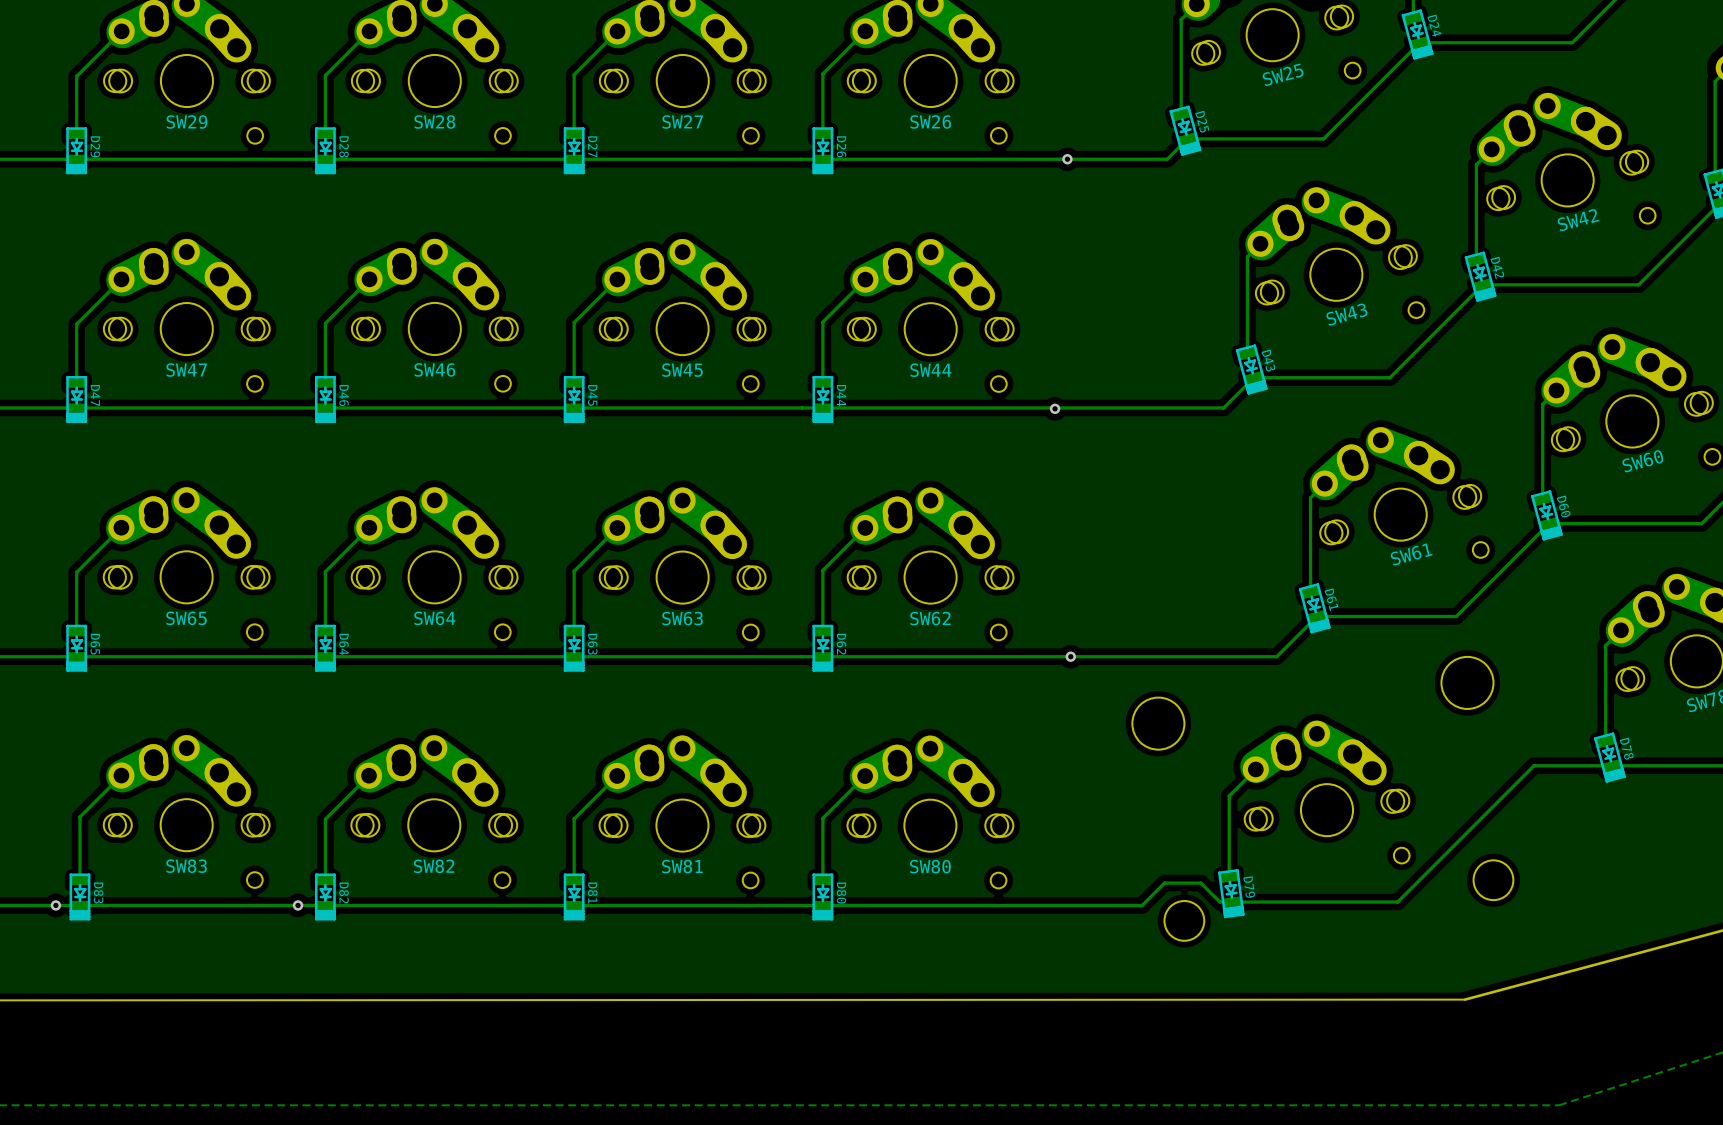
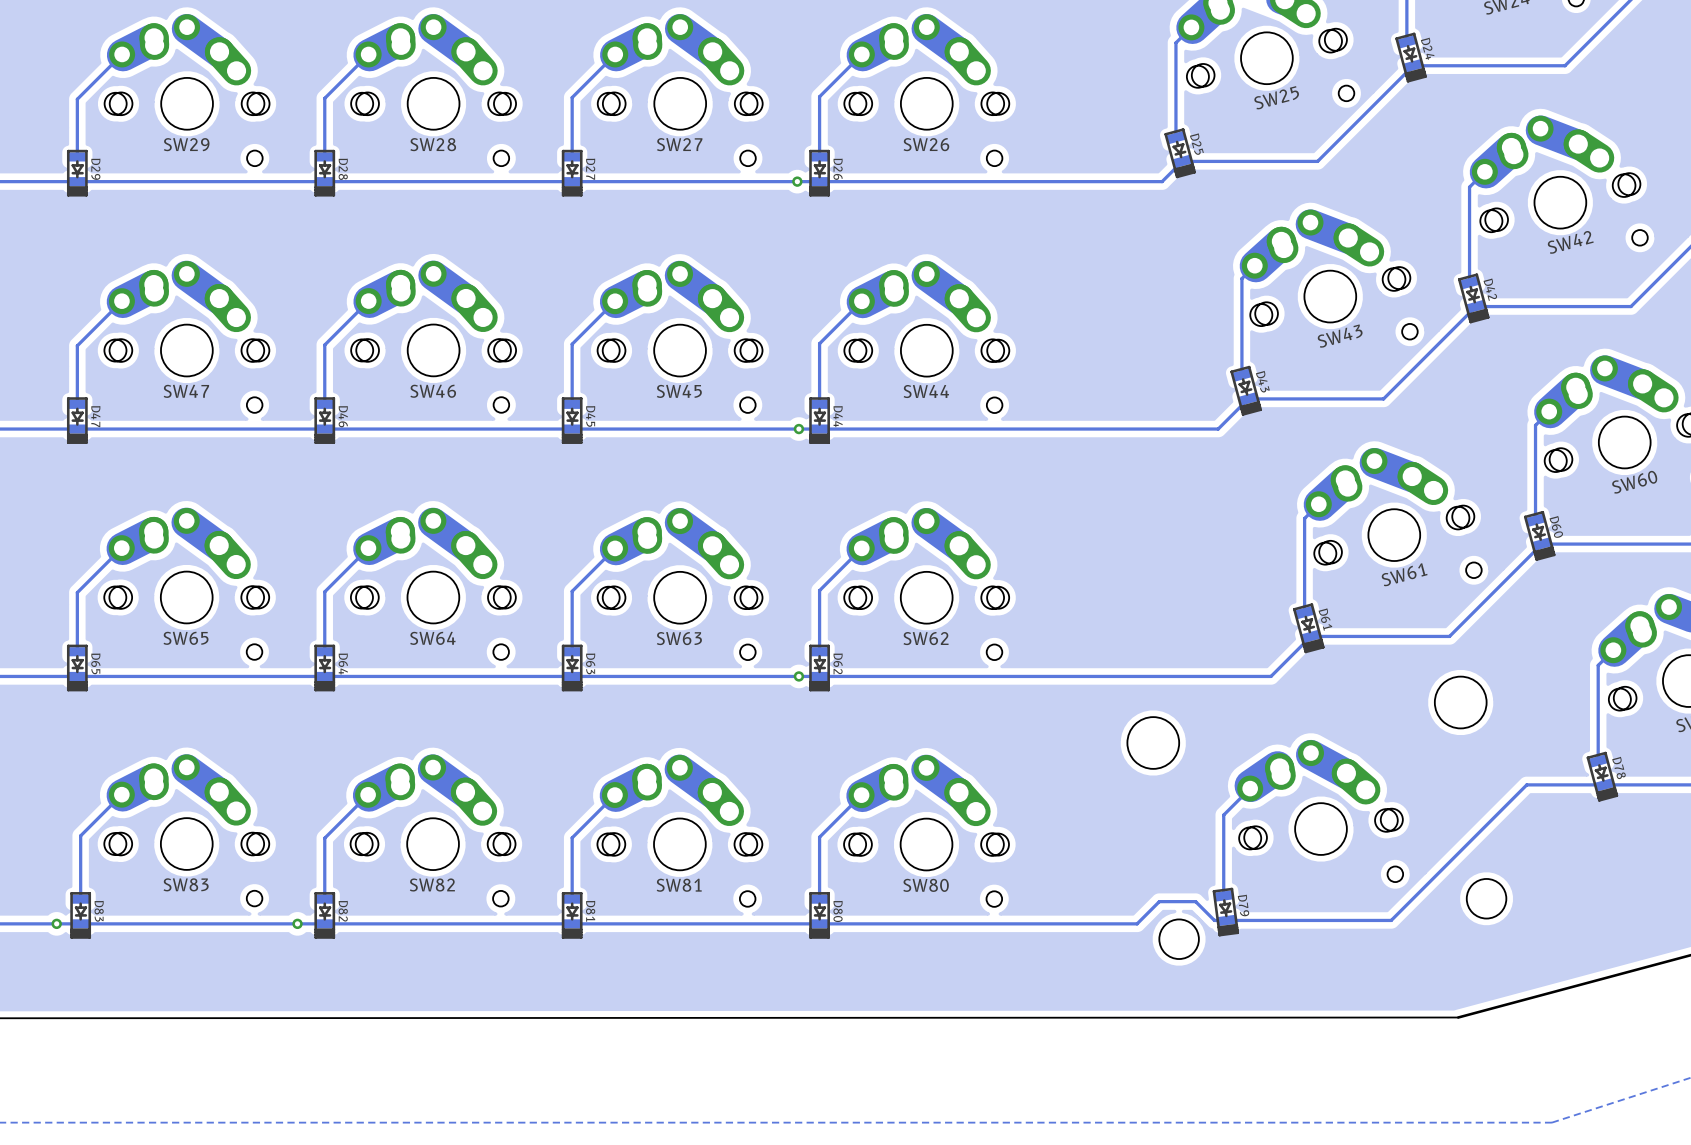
via: none -> (797, 181)
via: (1067, 159) -> none
via: none -> (798, 429)
via: (1055, 408) -> none
via: none -> (798, 676)
via: (1070, 656) -> none

